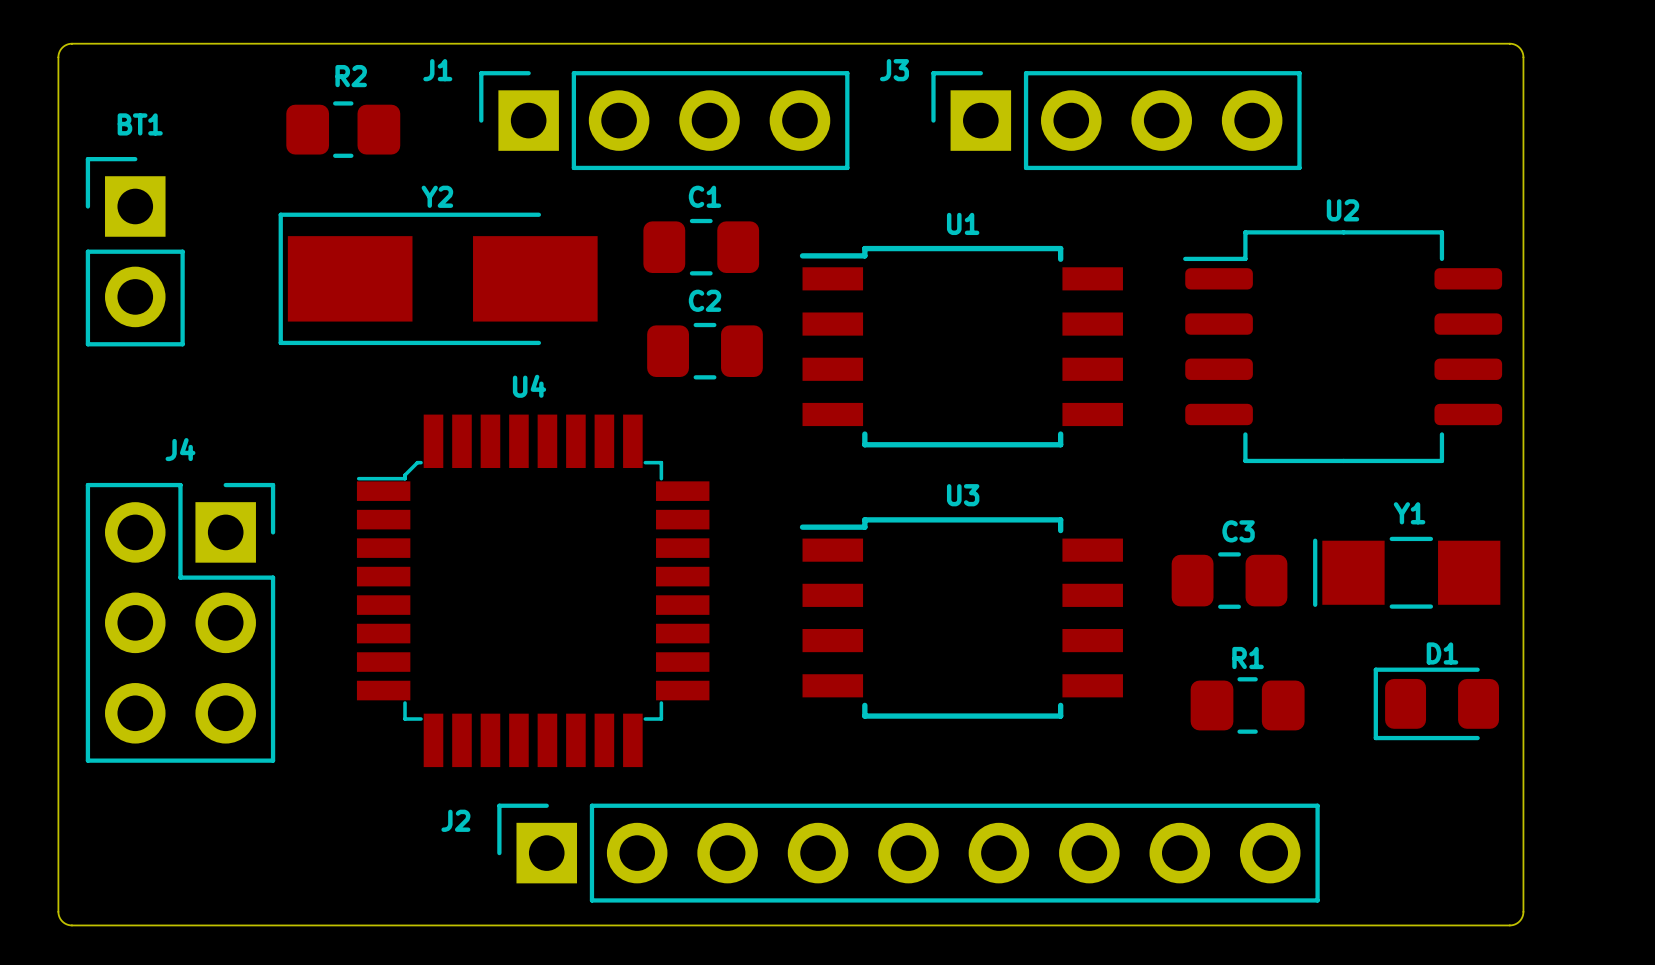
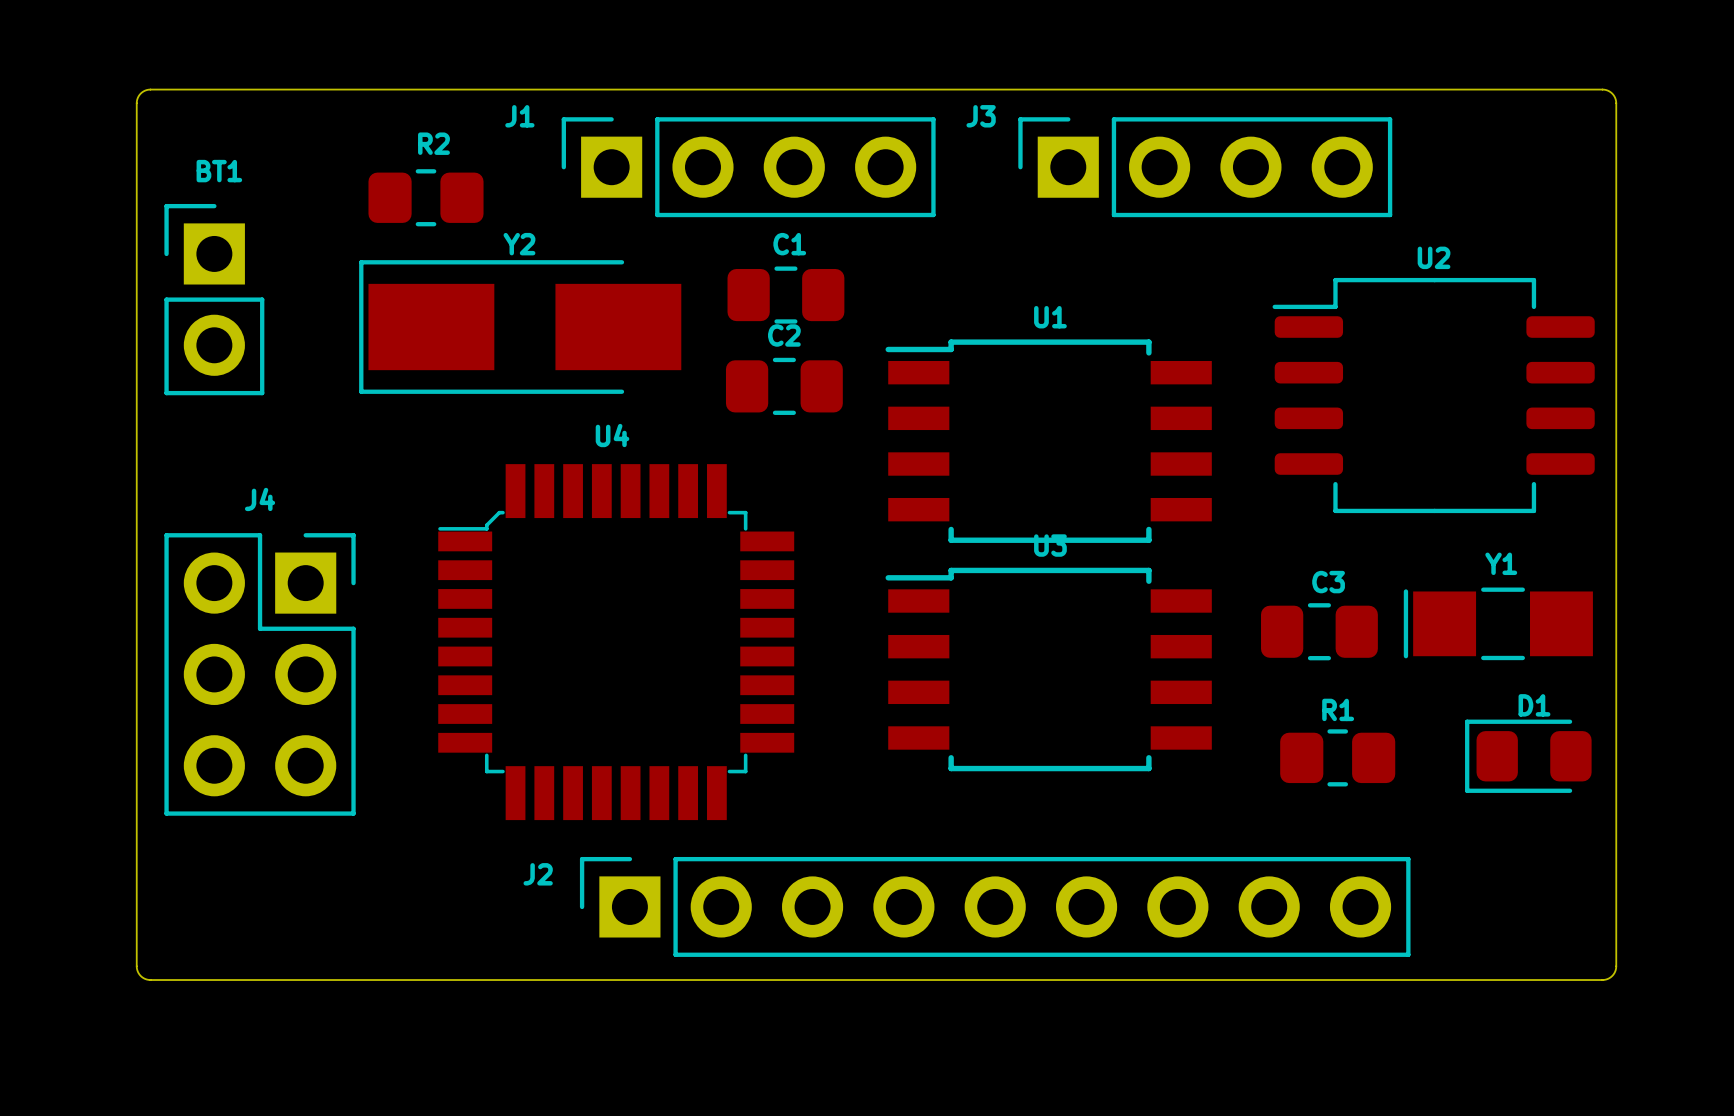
R2 position: (343, 129) -> (426, 197)
U1 position: (961, 346) -> (1048, 441)
C2 position: (705, 351) -> (784, 386)

